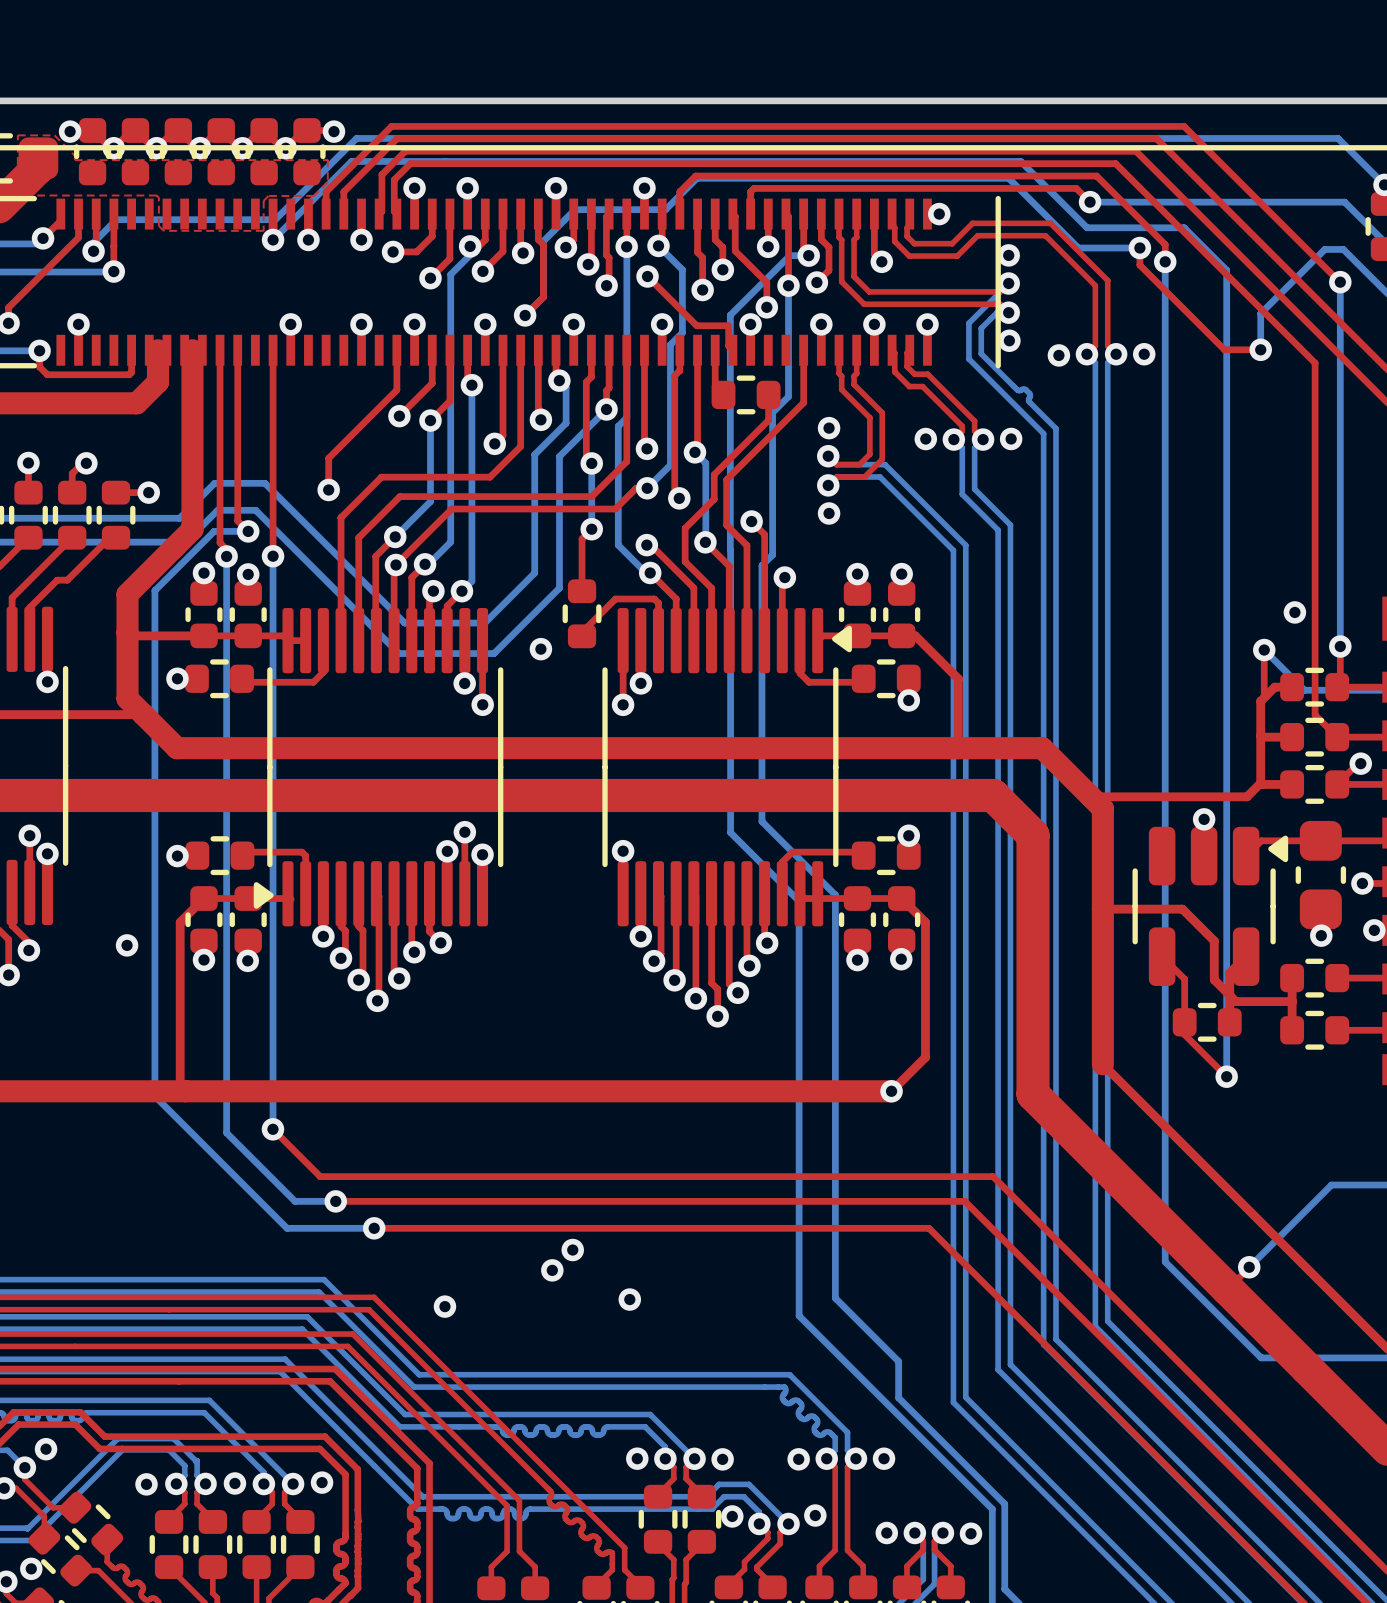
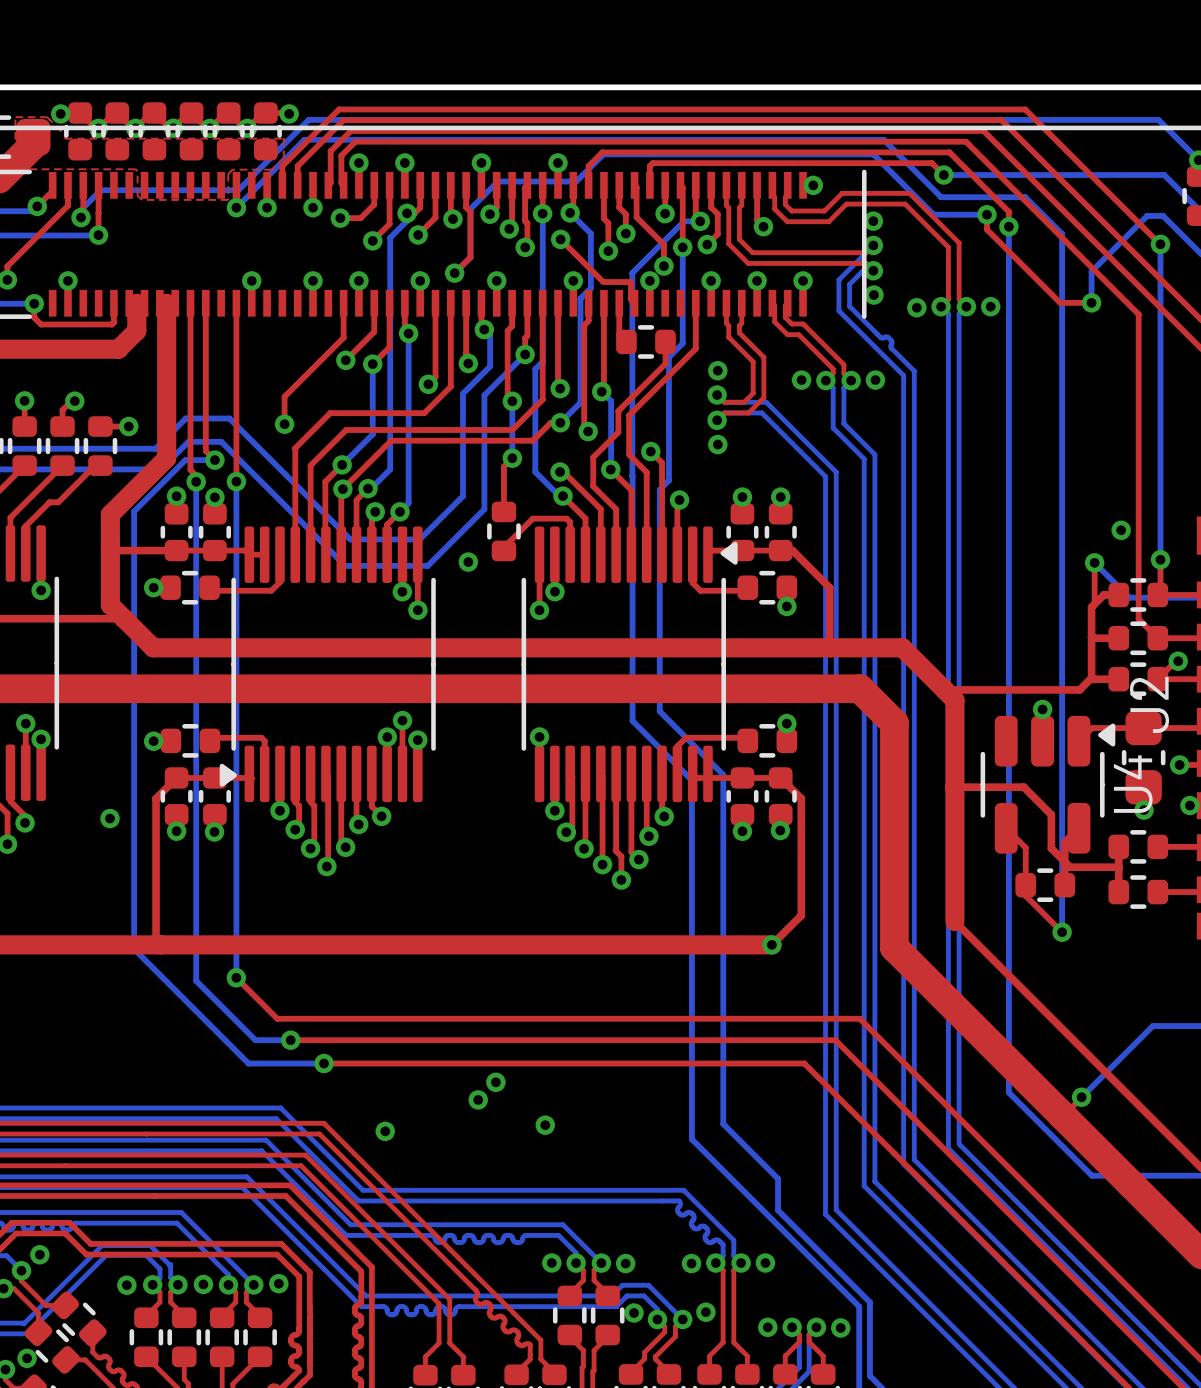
J2 name: none -> J2 (1149, 704)
U4 name: none -> U4 (1133, 784)

